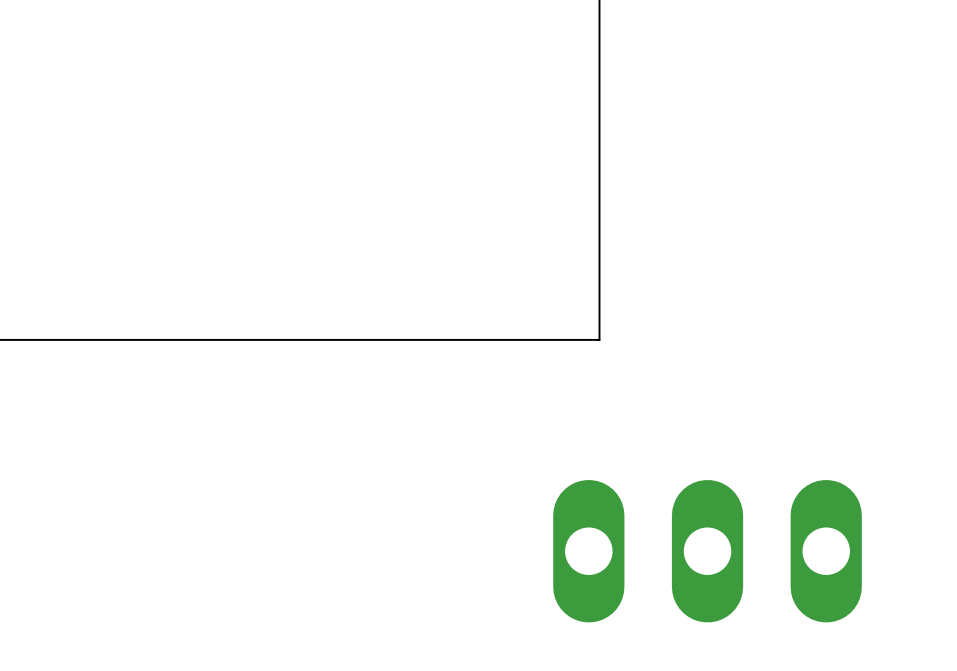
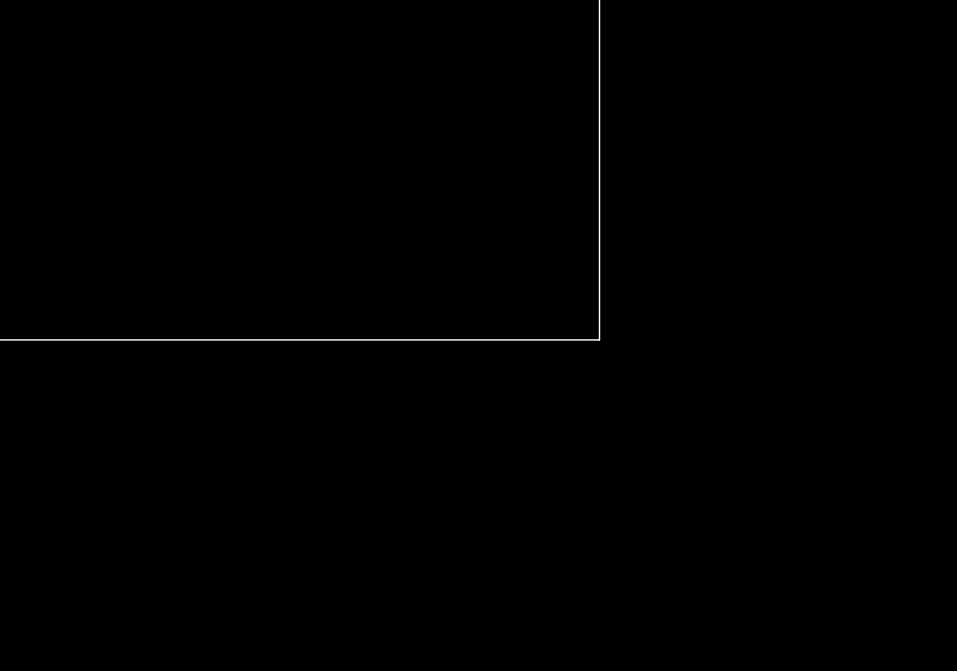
part: (707, 551) -> none

